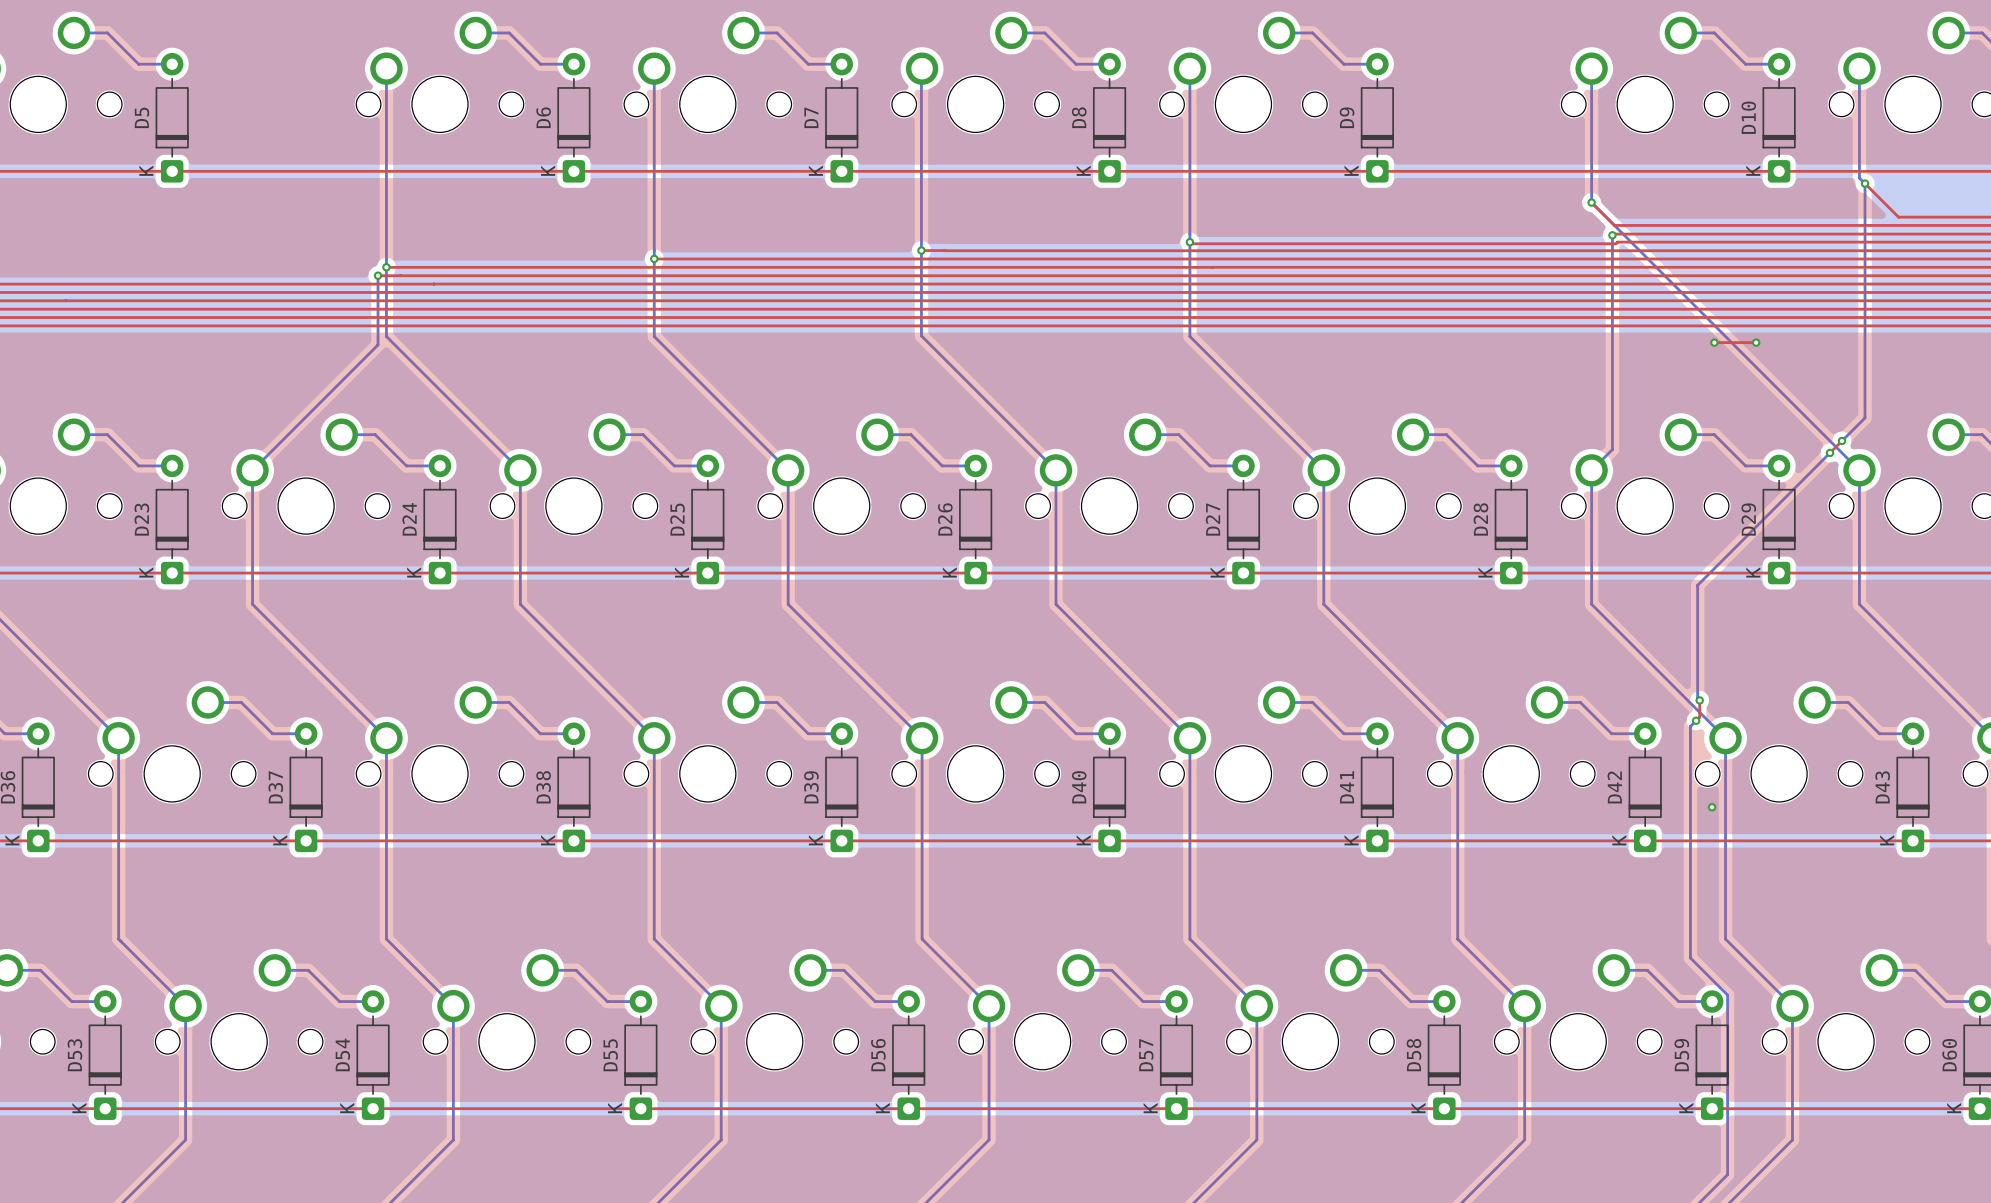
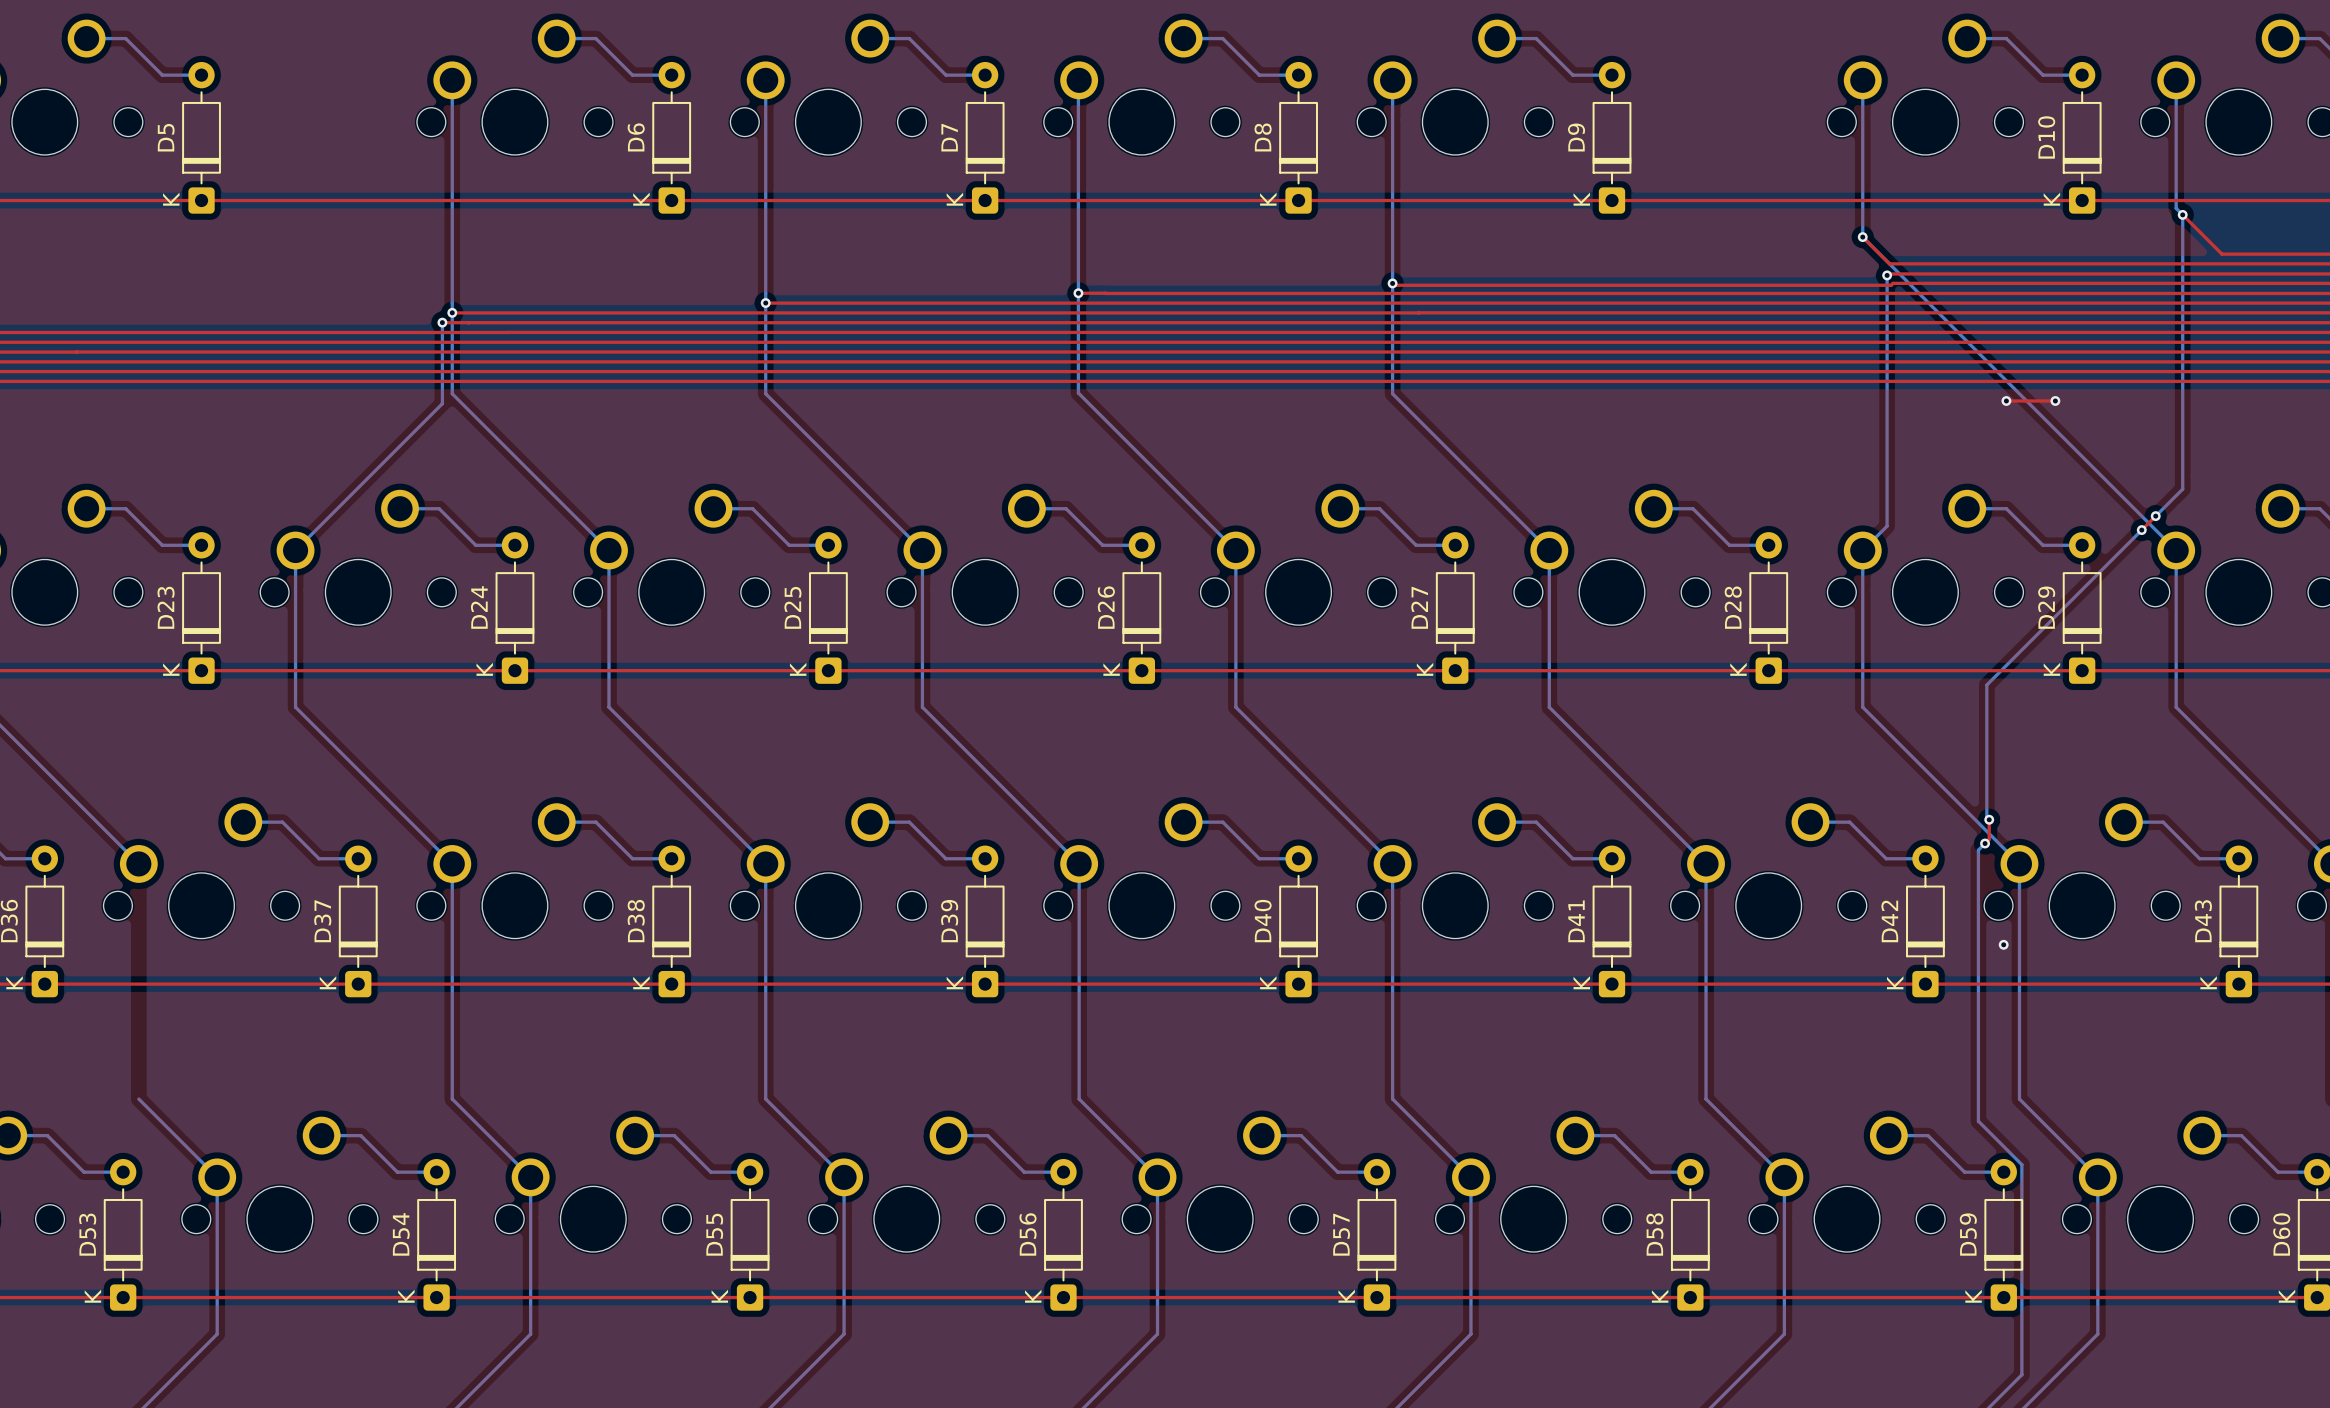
bottom track: (118, 738) (118, 939) -> none

